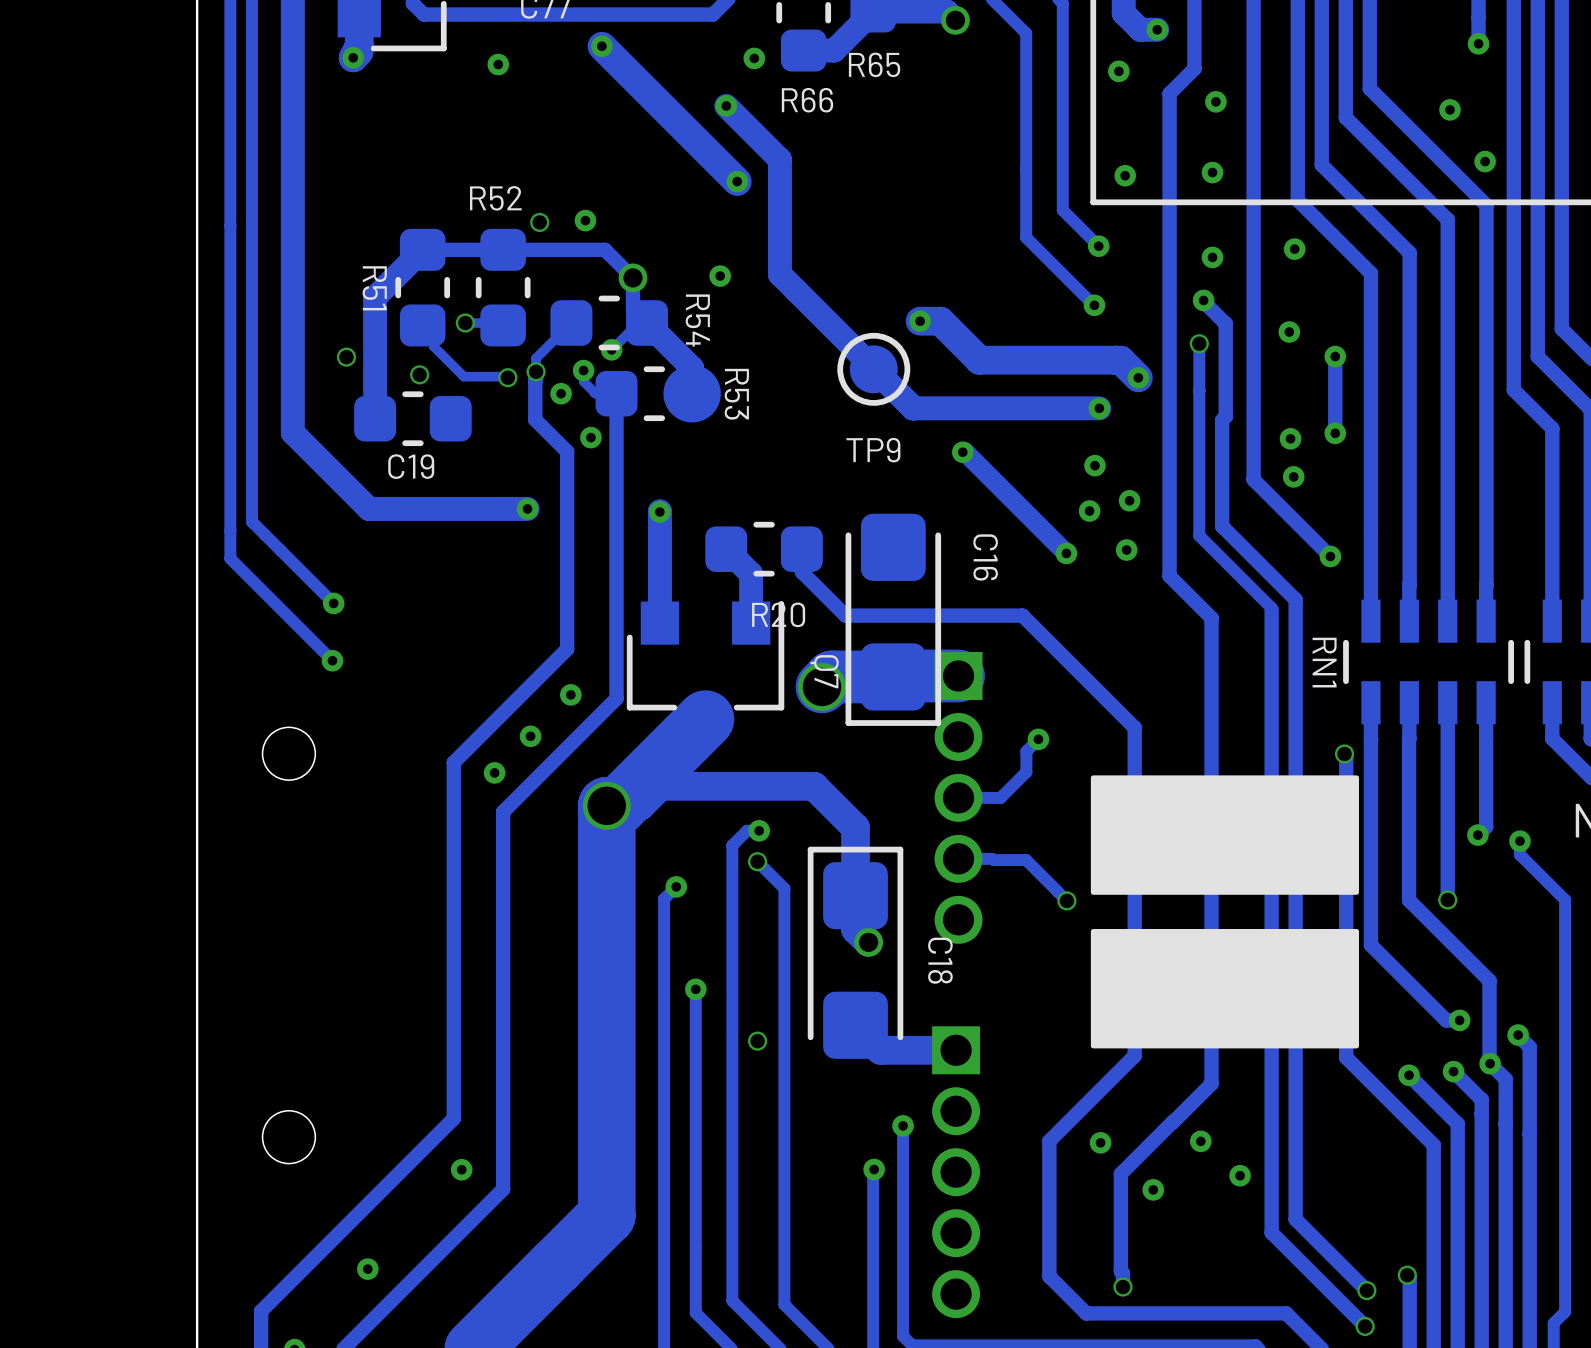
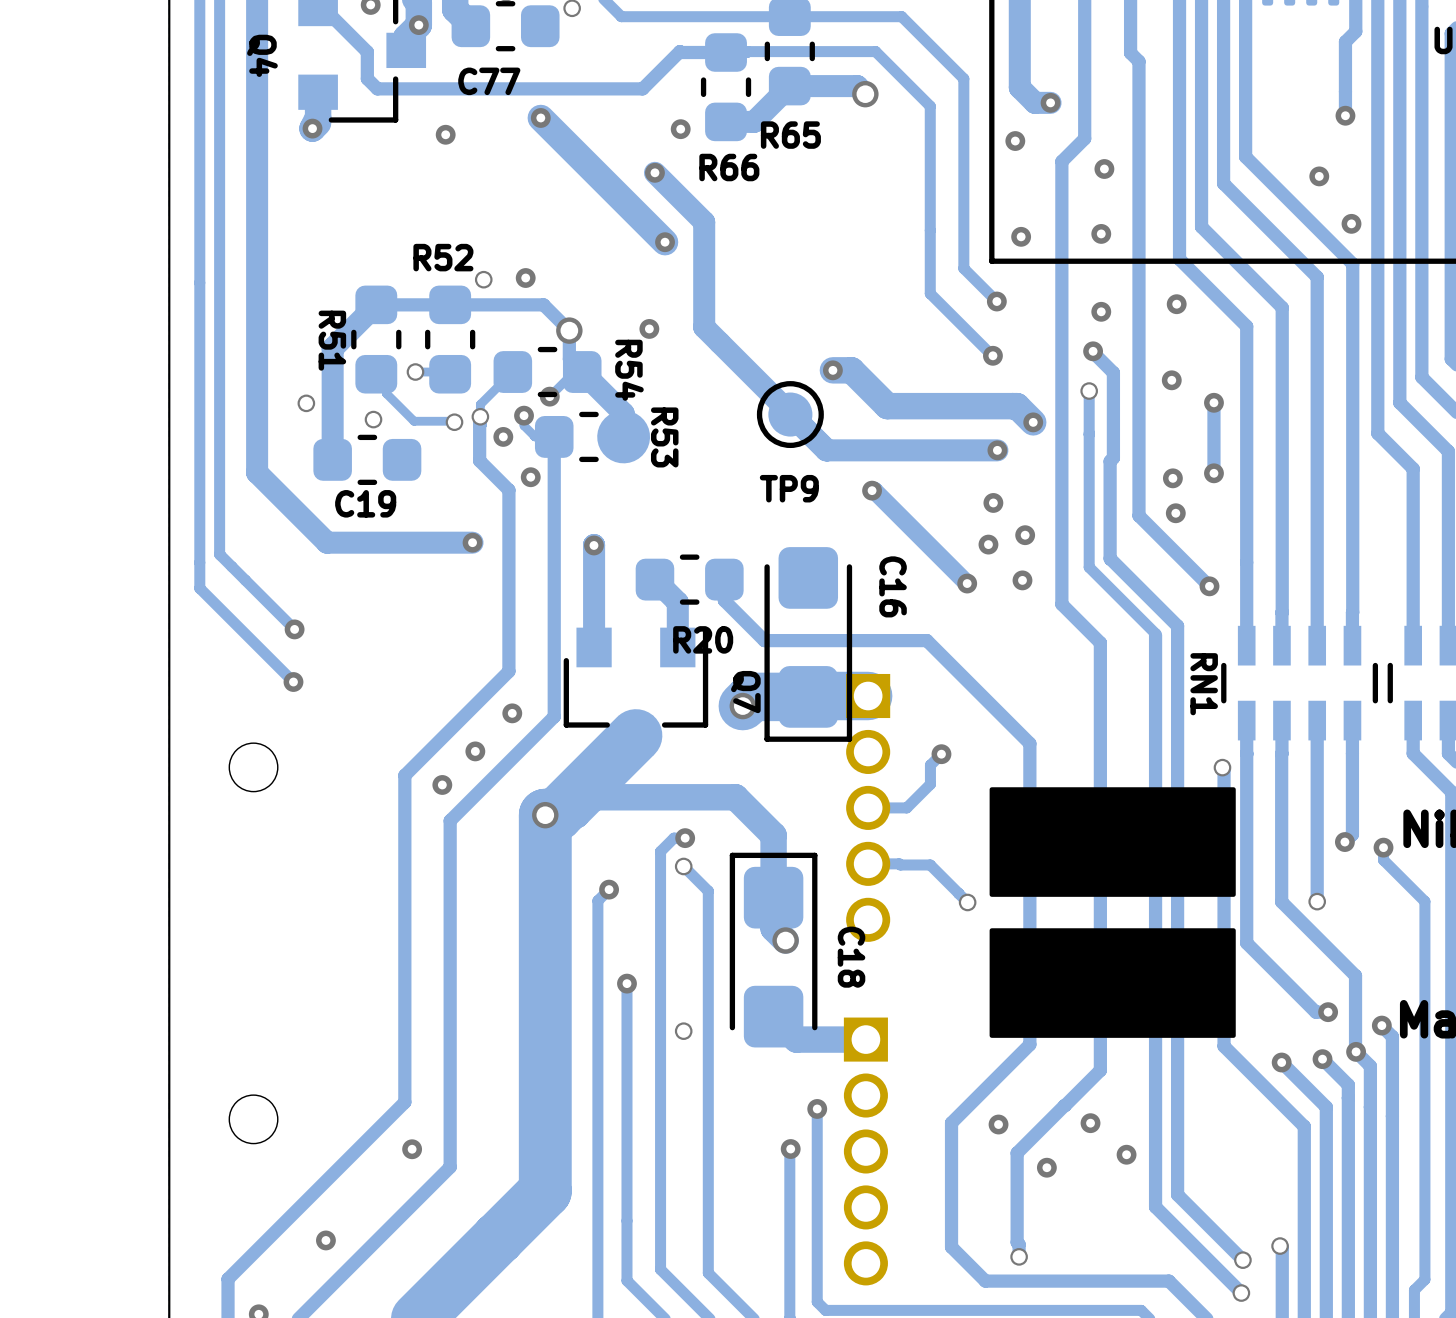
via size: [797, 662, 846, 711] -> [729, 692, 757, 720]
via size: [582, 781, 631, 830] -> [532, 801, 559, 829]

